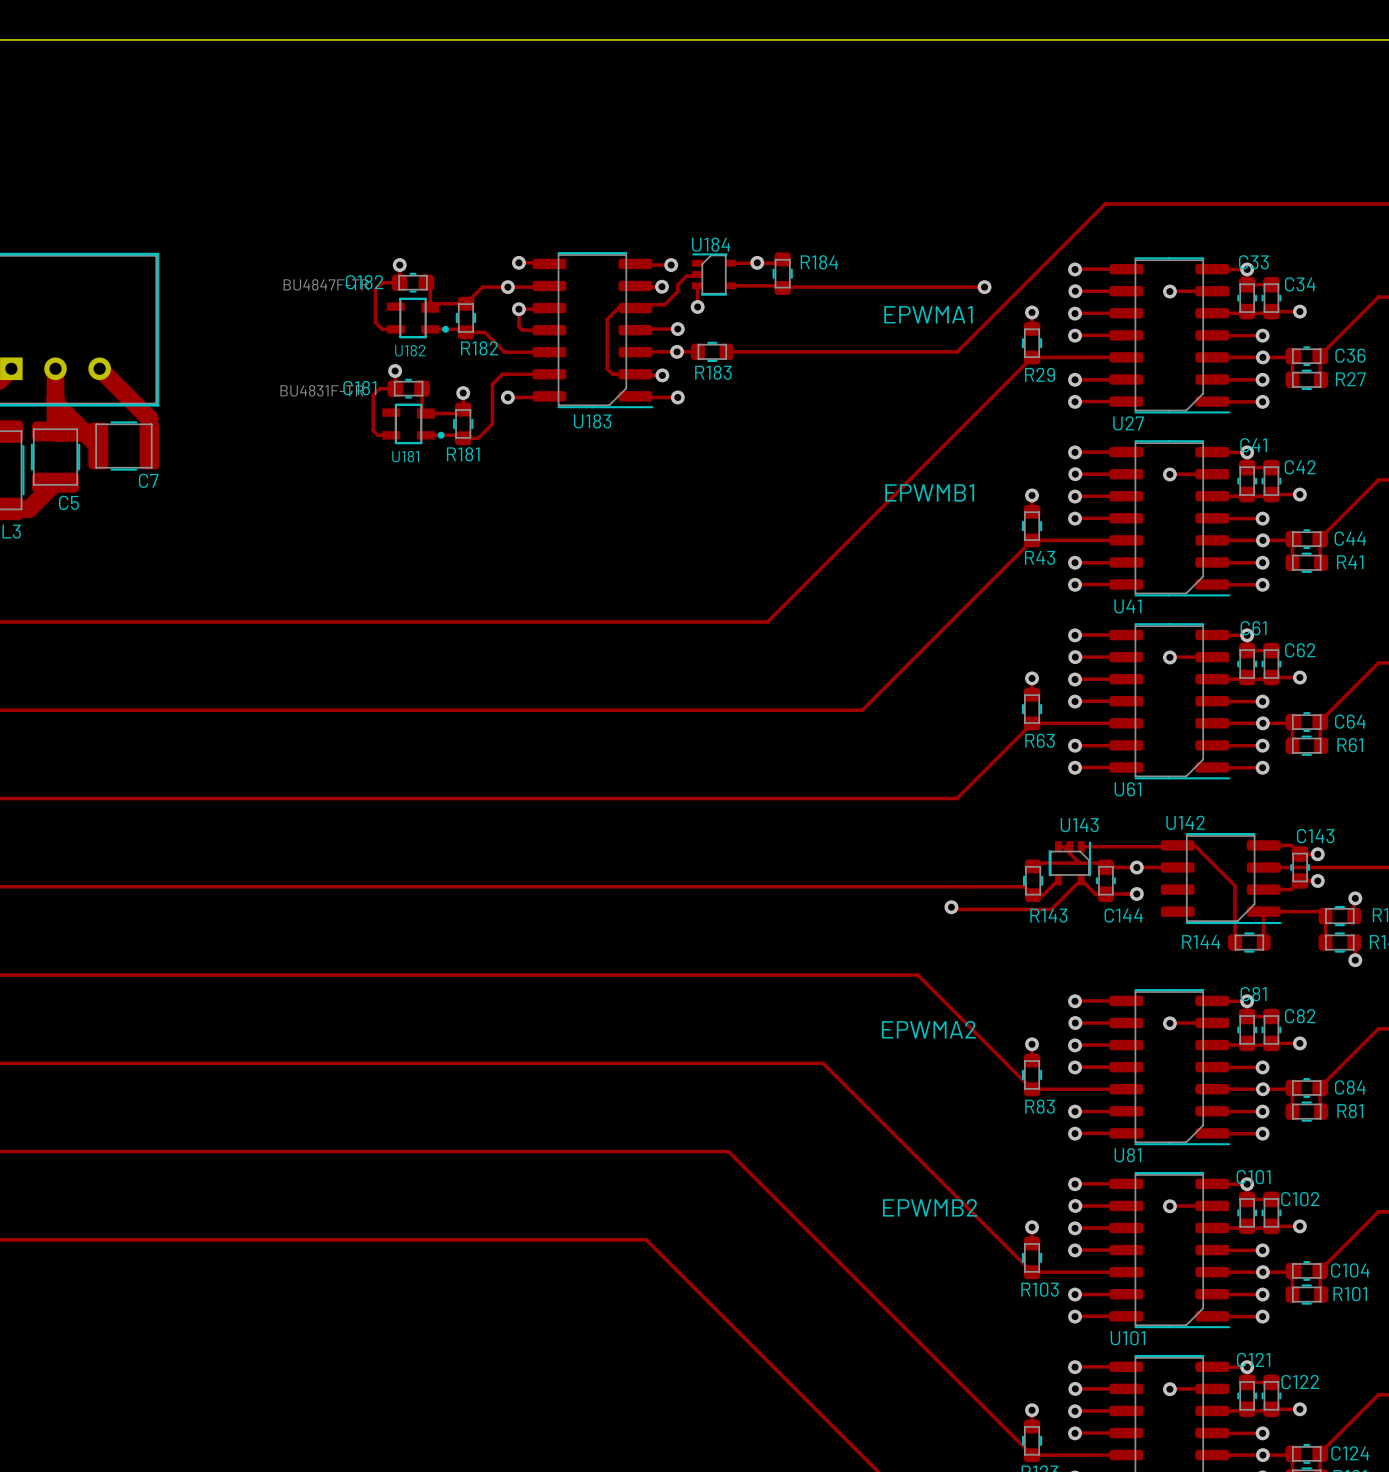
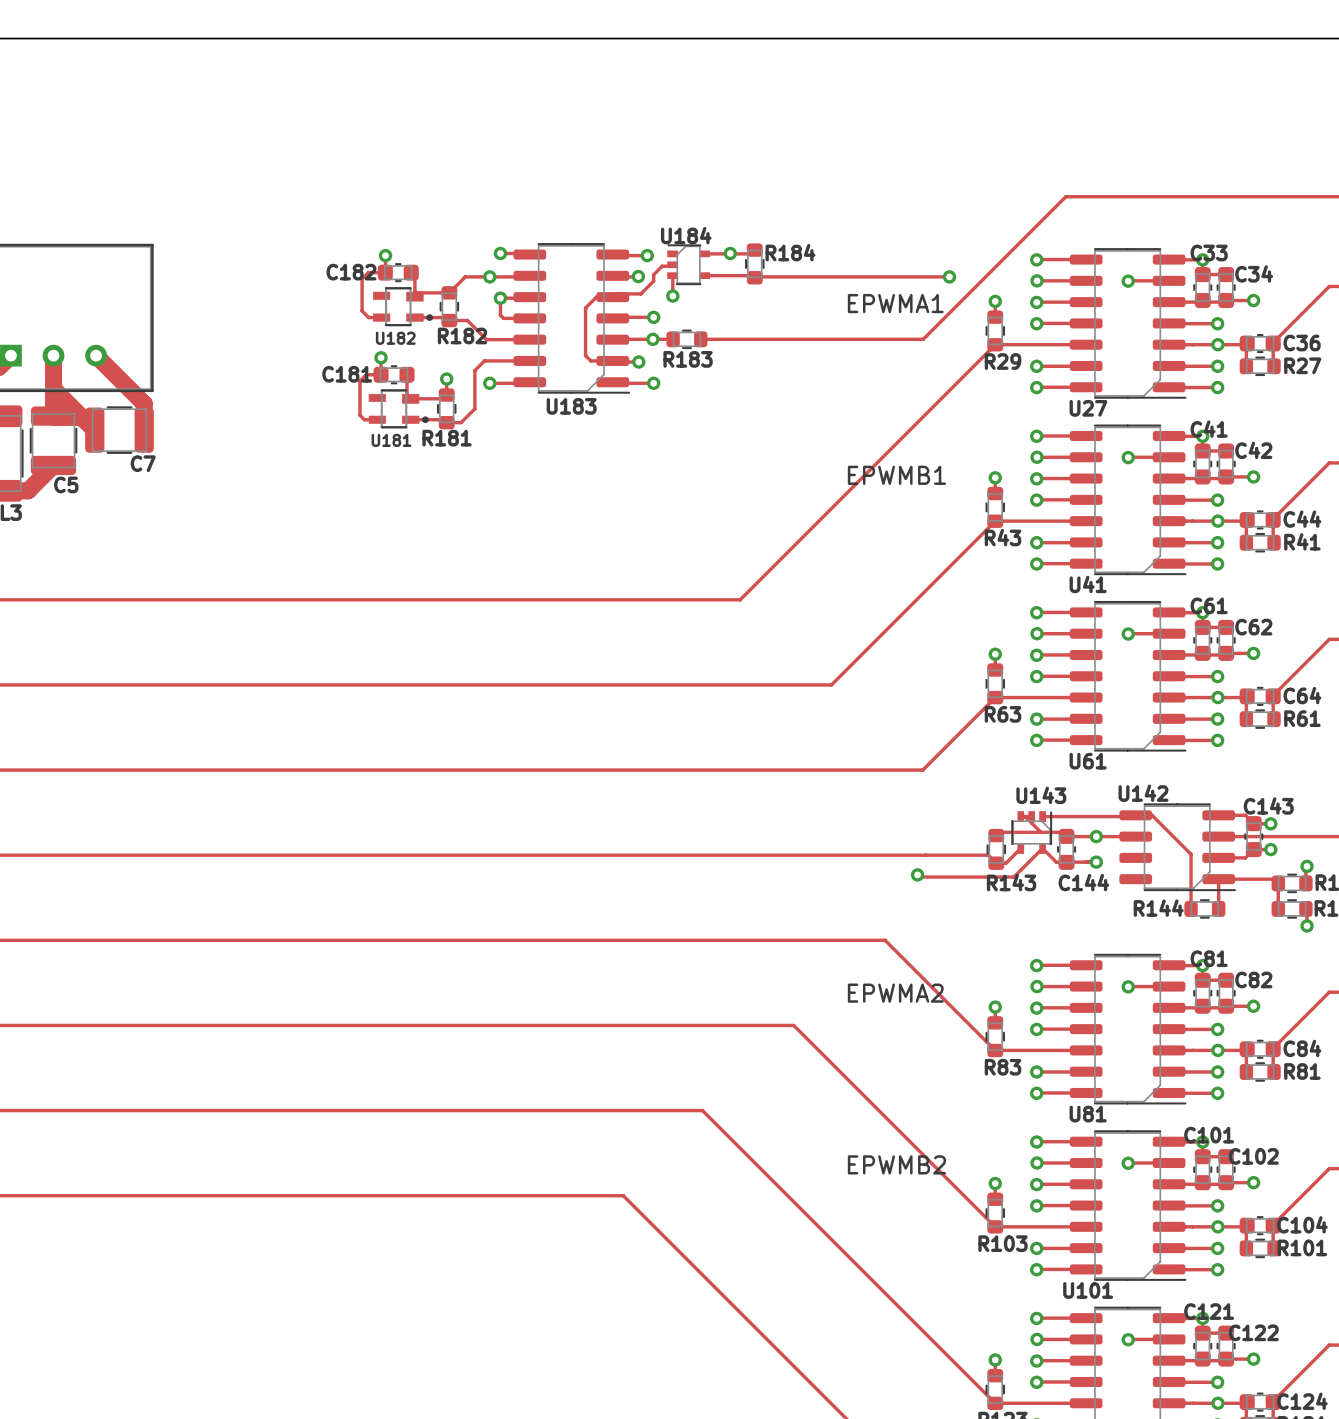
U182 value: BU4847F-TR (326, 284) -> none
U181 value: BU4831F-TR (321, 390) -> none

